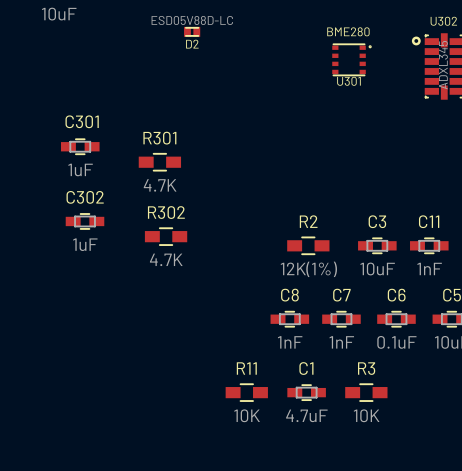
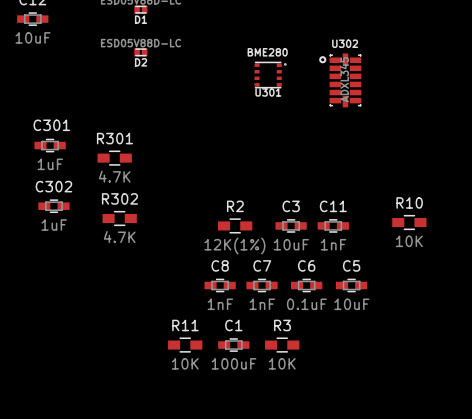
C1 value: 4.7uF (306, 415) -> 100uF (234, 363)

